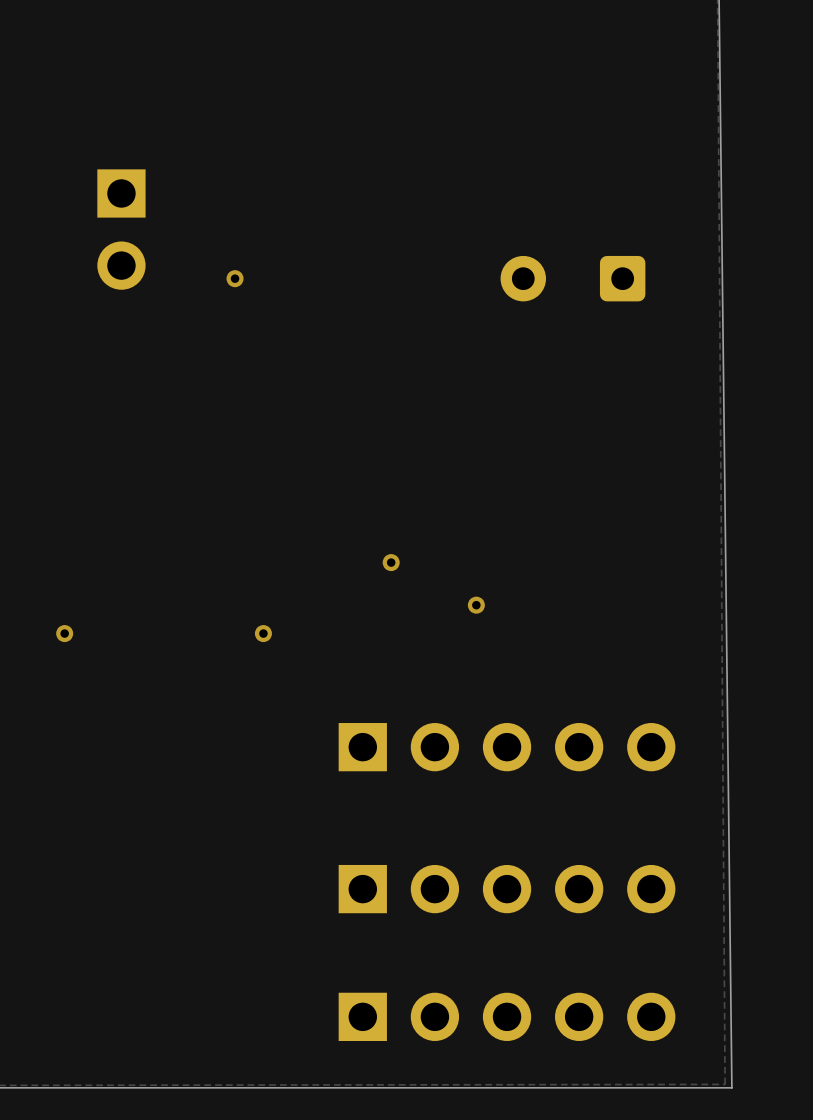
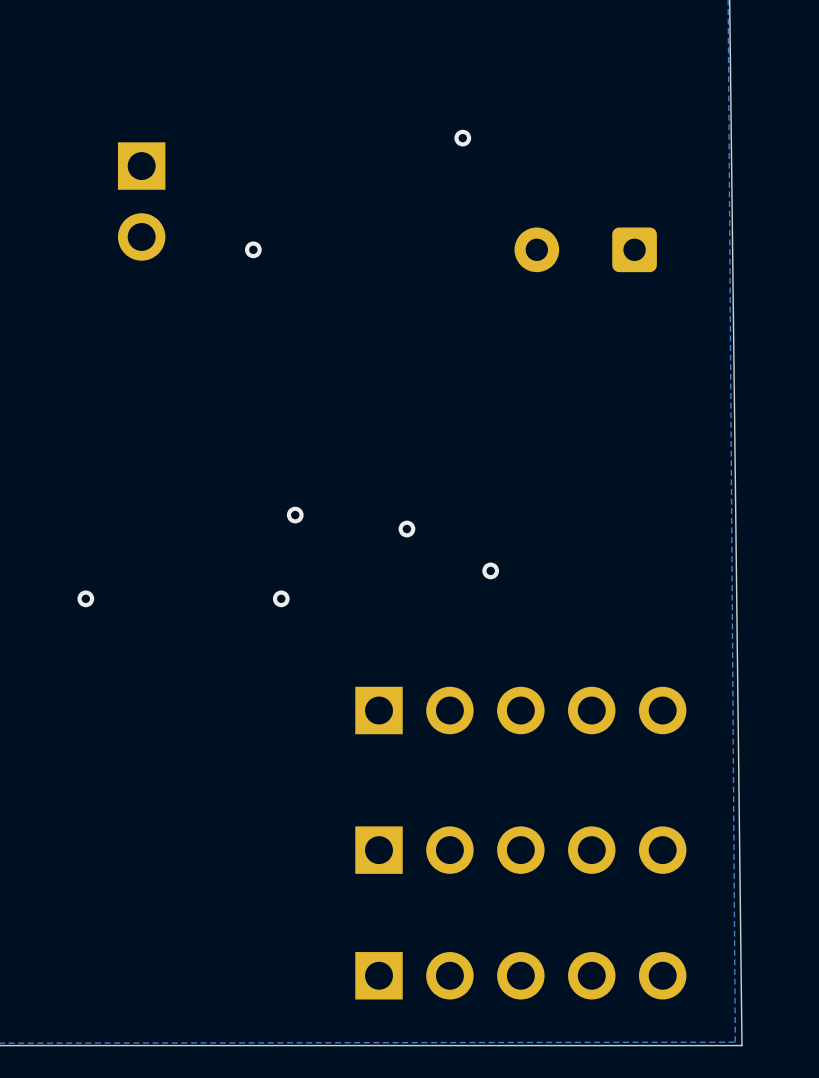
via: none -> (462, 138)
via: none -> (295, 515)

